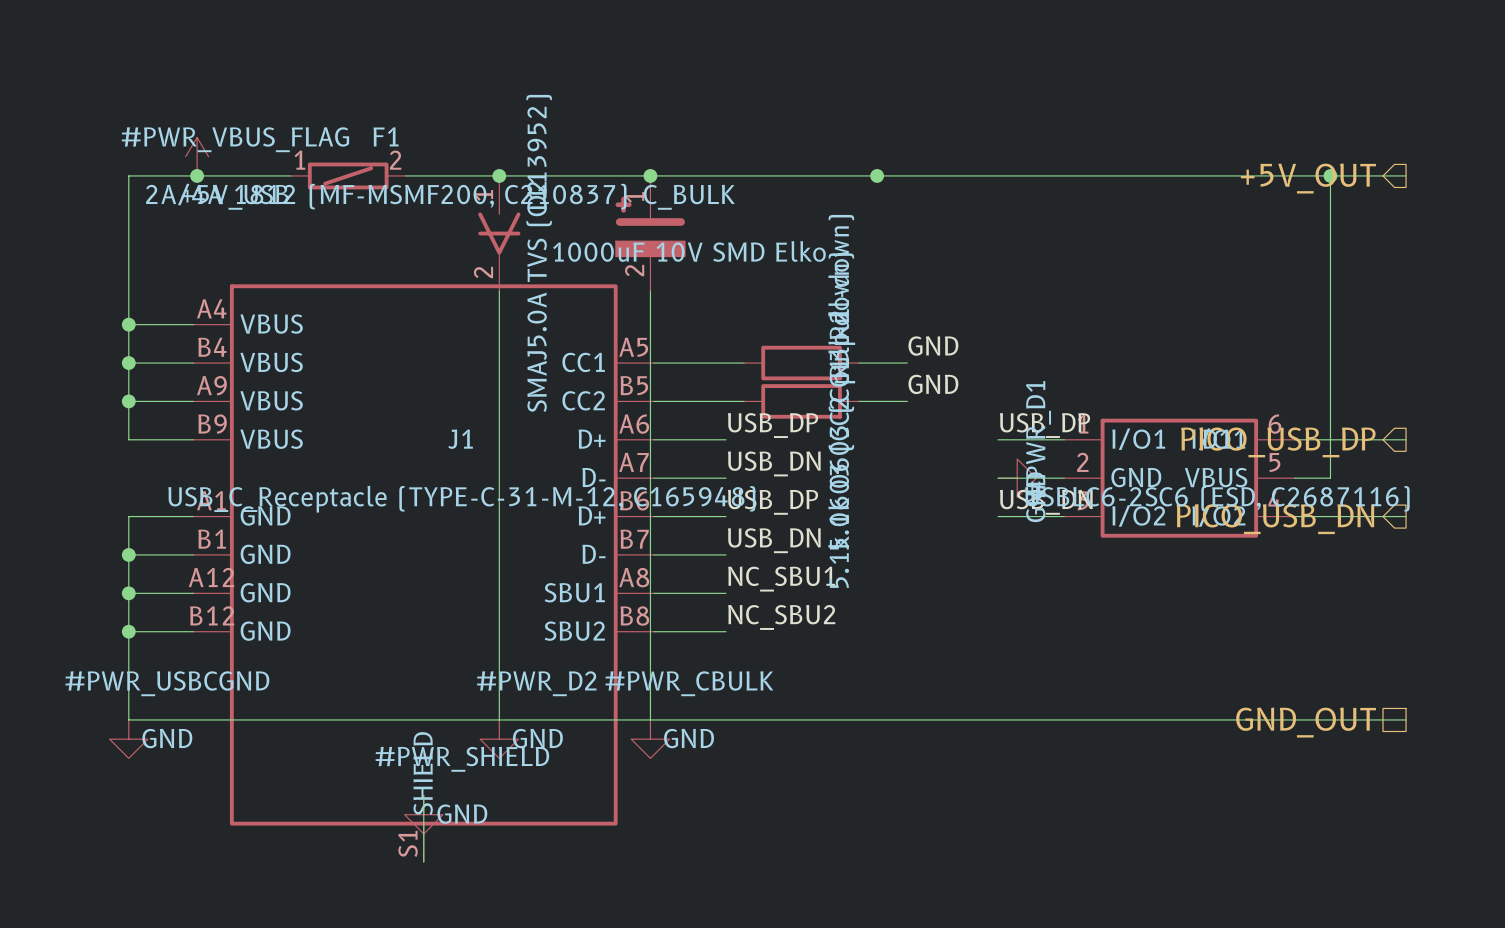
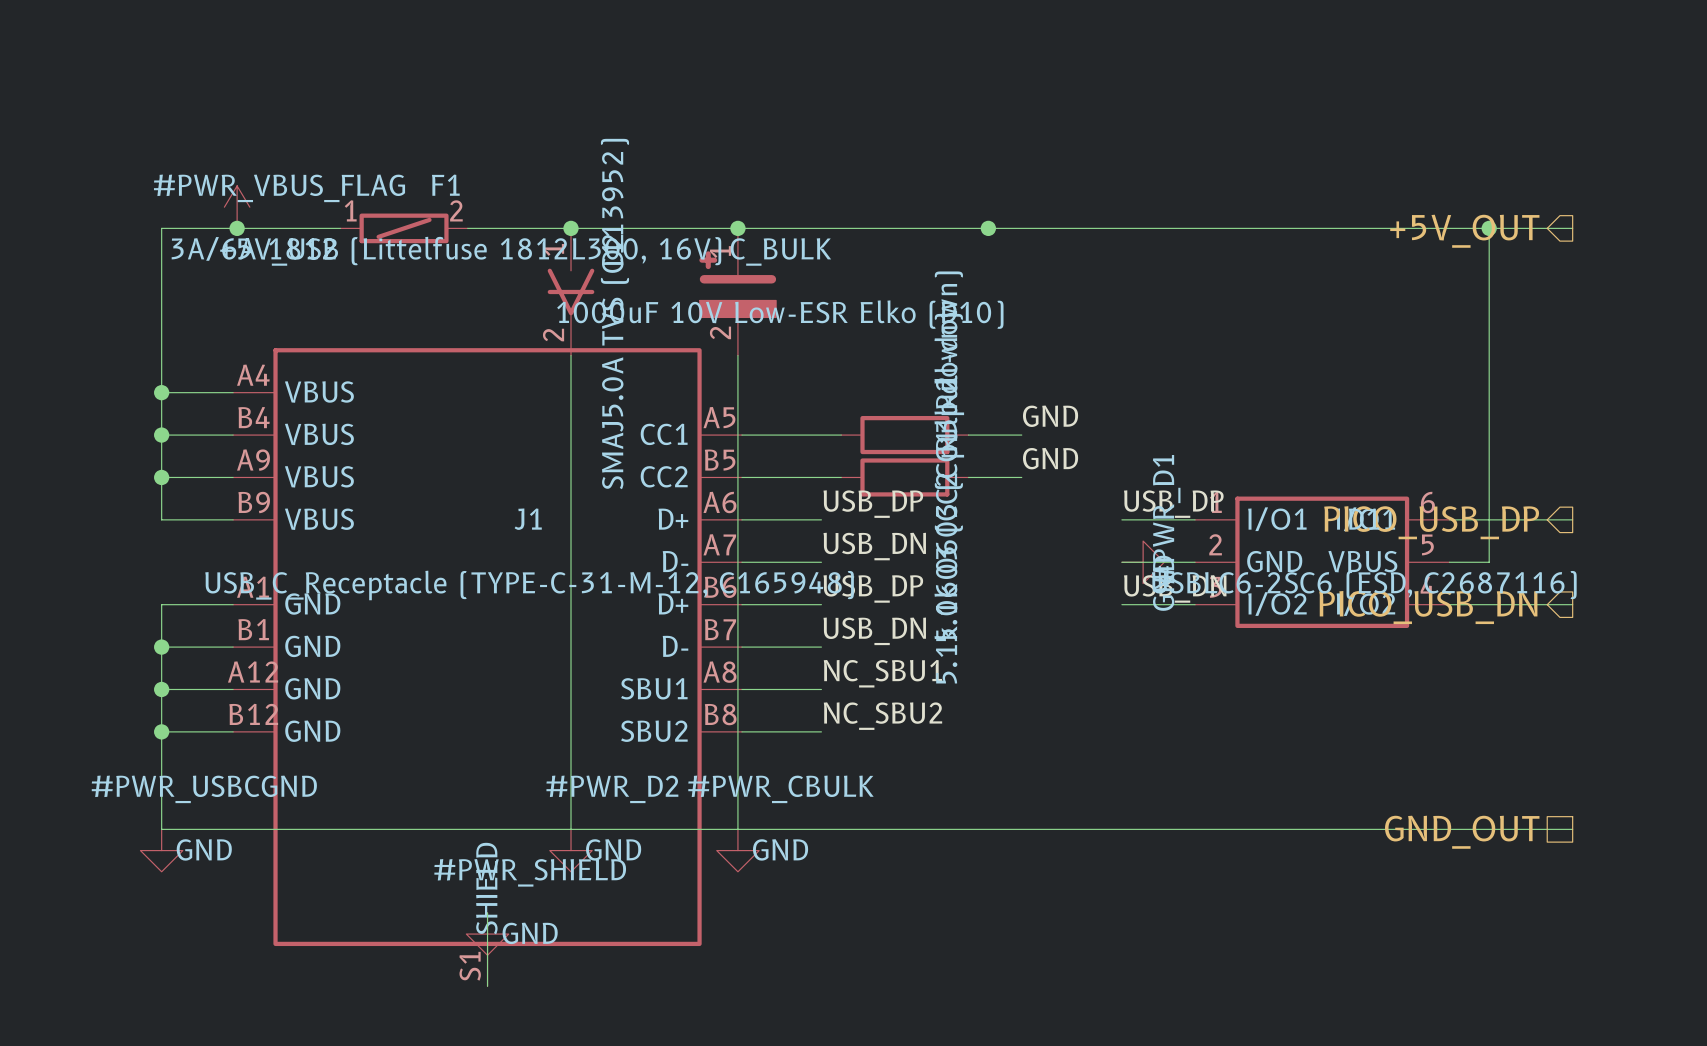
F1 value: 2A/4A 1812 (MF-MSMF200, C210837) (386, 196) -> 3A/6A 1812 (Littelfuse 1812L300, 16V) (446, 251)
C_BULK value: 1000uF 10V SMD Elko (689, 251) -> 1000uF 10V Low-ESR Elko (D10) (780, 314)

